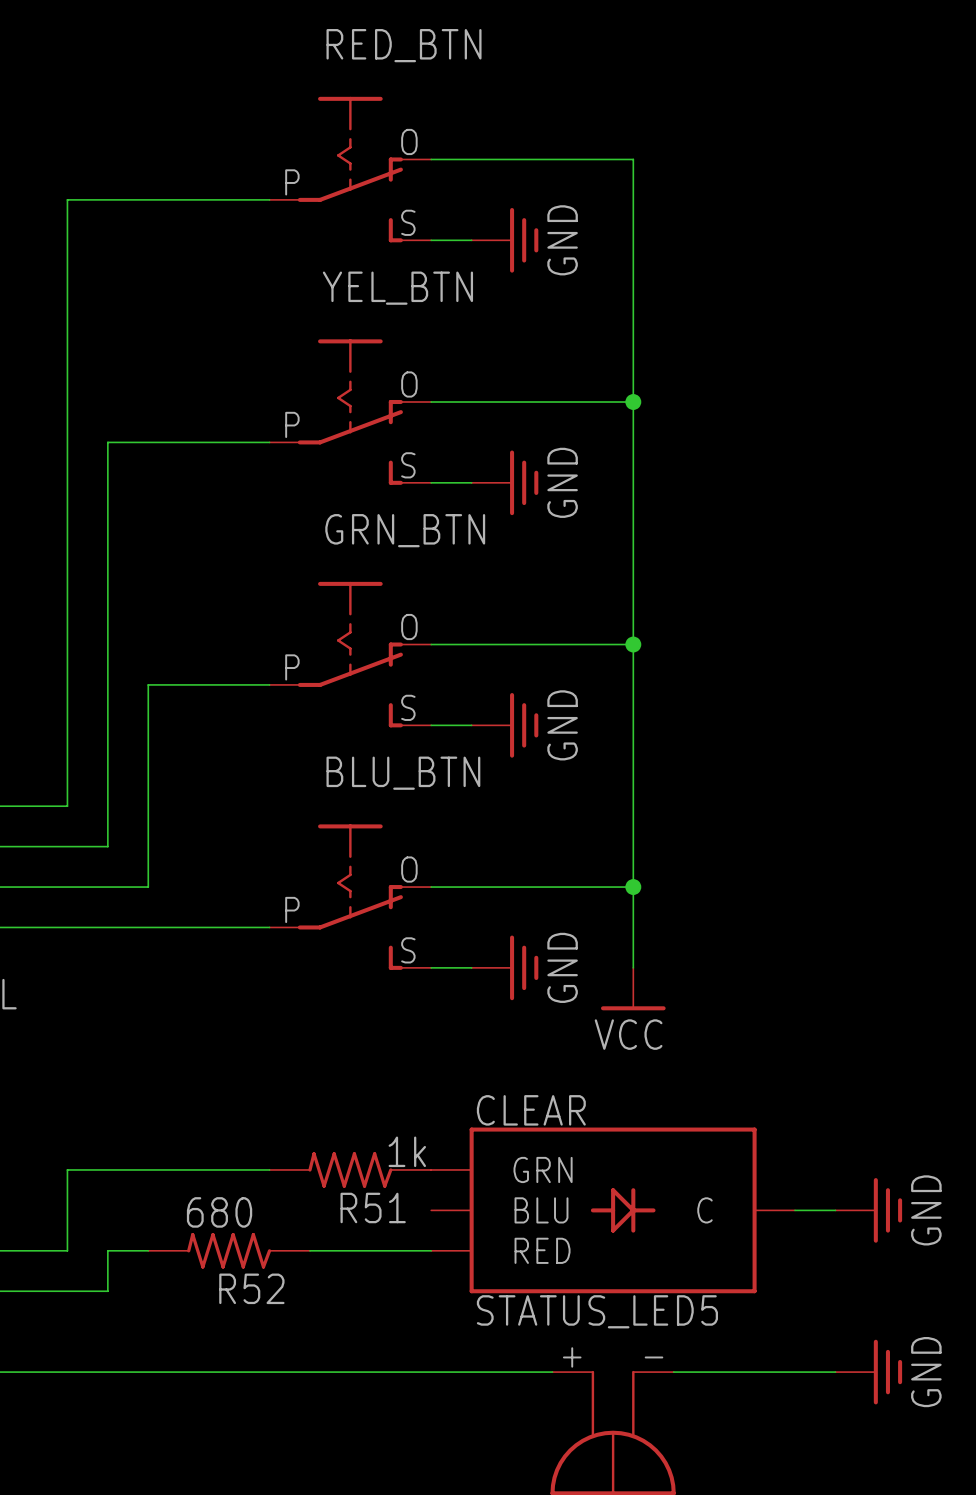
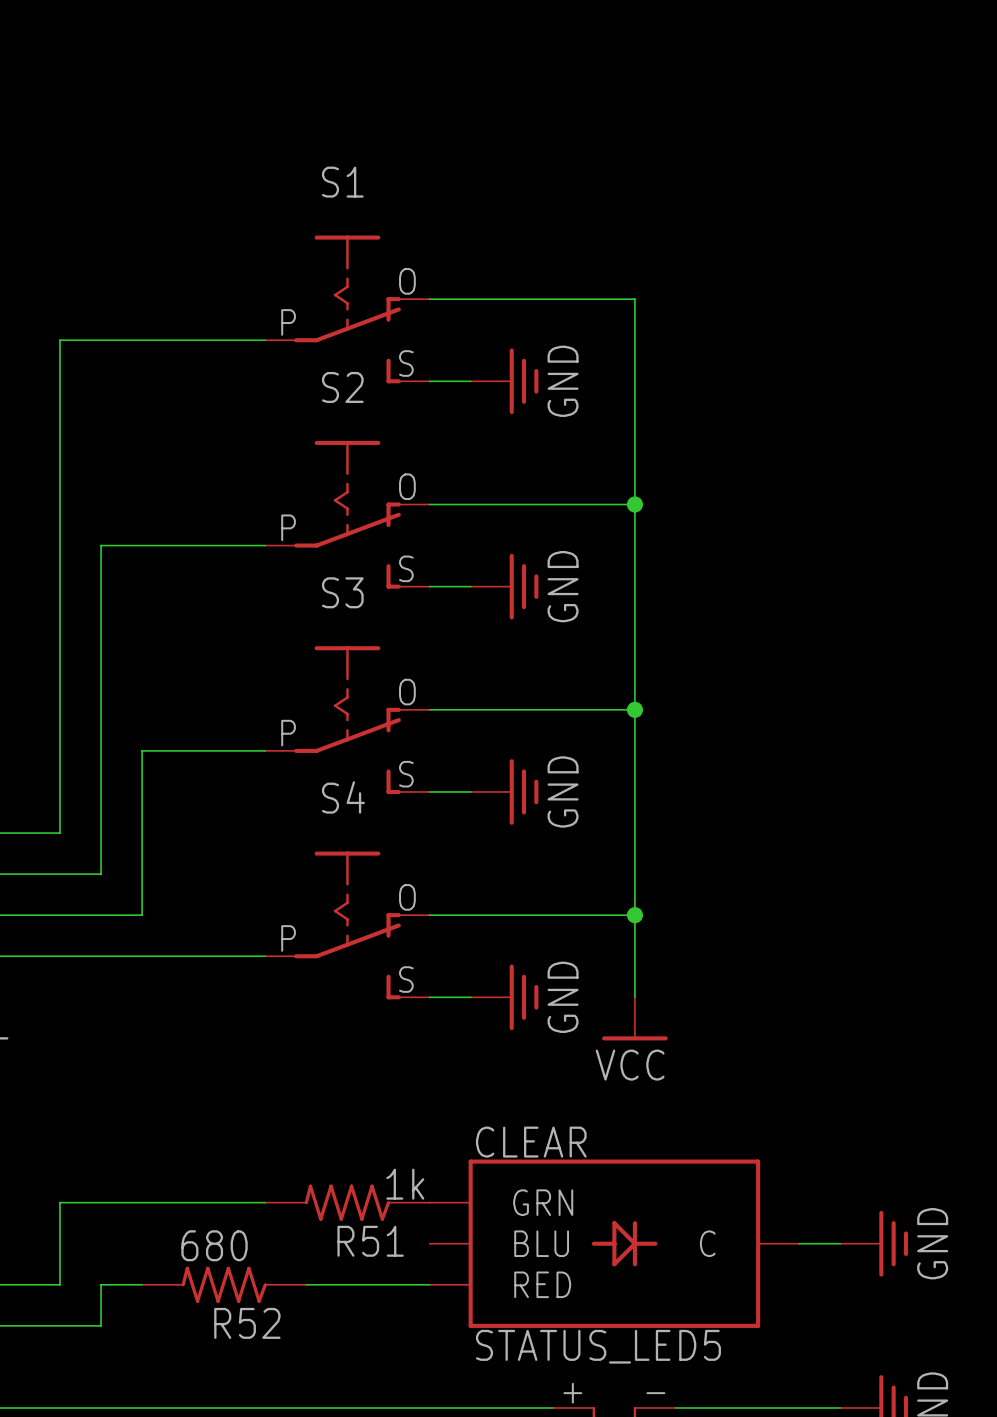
wire: (431, 159) (633, 159) (633, 280) -> (429, 299) (634, 299)
RED_BTN: (350, 169) -> none
wire: (269, 199) (67, 199) (67, 321) -> (265, 340) (59, 340)
wire: (431, 240) (471, 240) -> (429, 381) (470, 381)
power symbol: GND (504, 240) -> none
S1: none -> (347, 309)
power symbol: none -> GND (504, 381)
wire: (431, 402) (633, 402) -> none
junction: (633, 402) -> none
YEL_BTN: (350, 412) -> none
wire: (269, 442) (107, 442) (107, 523) -> (265, 545) (101, 545)
wire: none -> (470, 504) (634, 504)
power symbol: GND (504, 482) -> none
junction: none -> (634, 504)
S2: none -> (347, 514)
wire: none -> (429, 586) (470, 586)
power symbol: none -> GND (504, 586)
wire: (431, 644) (633, 644) -> (429, 709) (634, 709)
junction position: (633, 644) -> (634, 709)
GRN_BTN: (350, 654) -> none
wire: (269, 684) (148, 684) (148, 725) -> (265, 750) (142, 750)
S3: none -> (347, 720)
wire: (431, 725) (471, 725) -> (429, 791) (470, 791)
power symbol position: GND (504, 725) -> GND (504, 791)
BLU_BTN name: BLU_BTN (403, 773) -> S4 (343, 797)

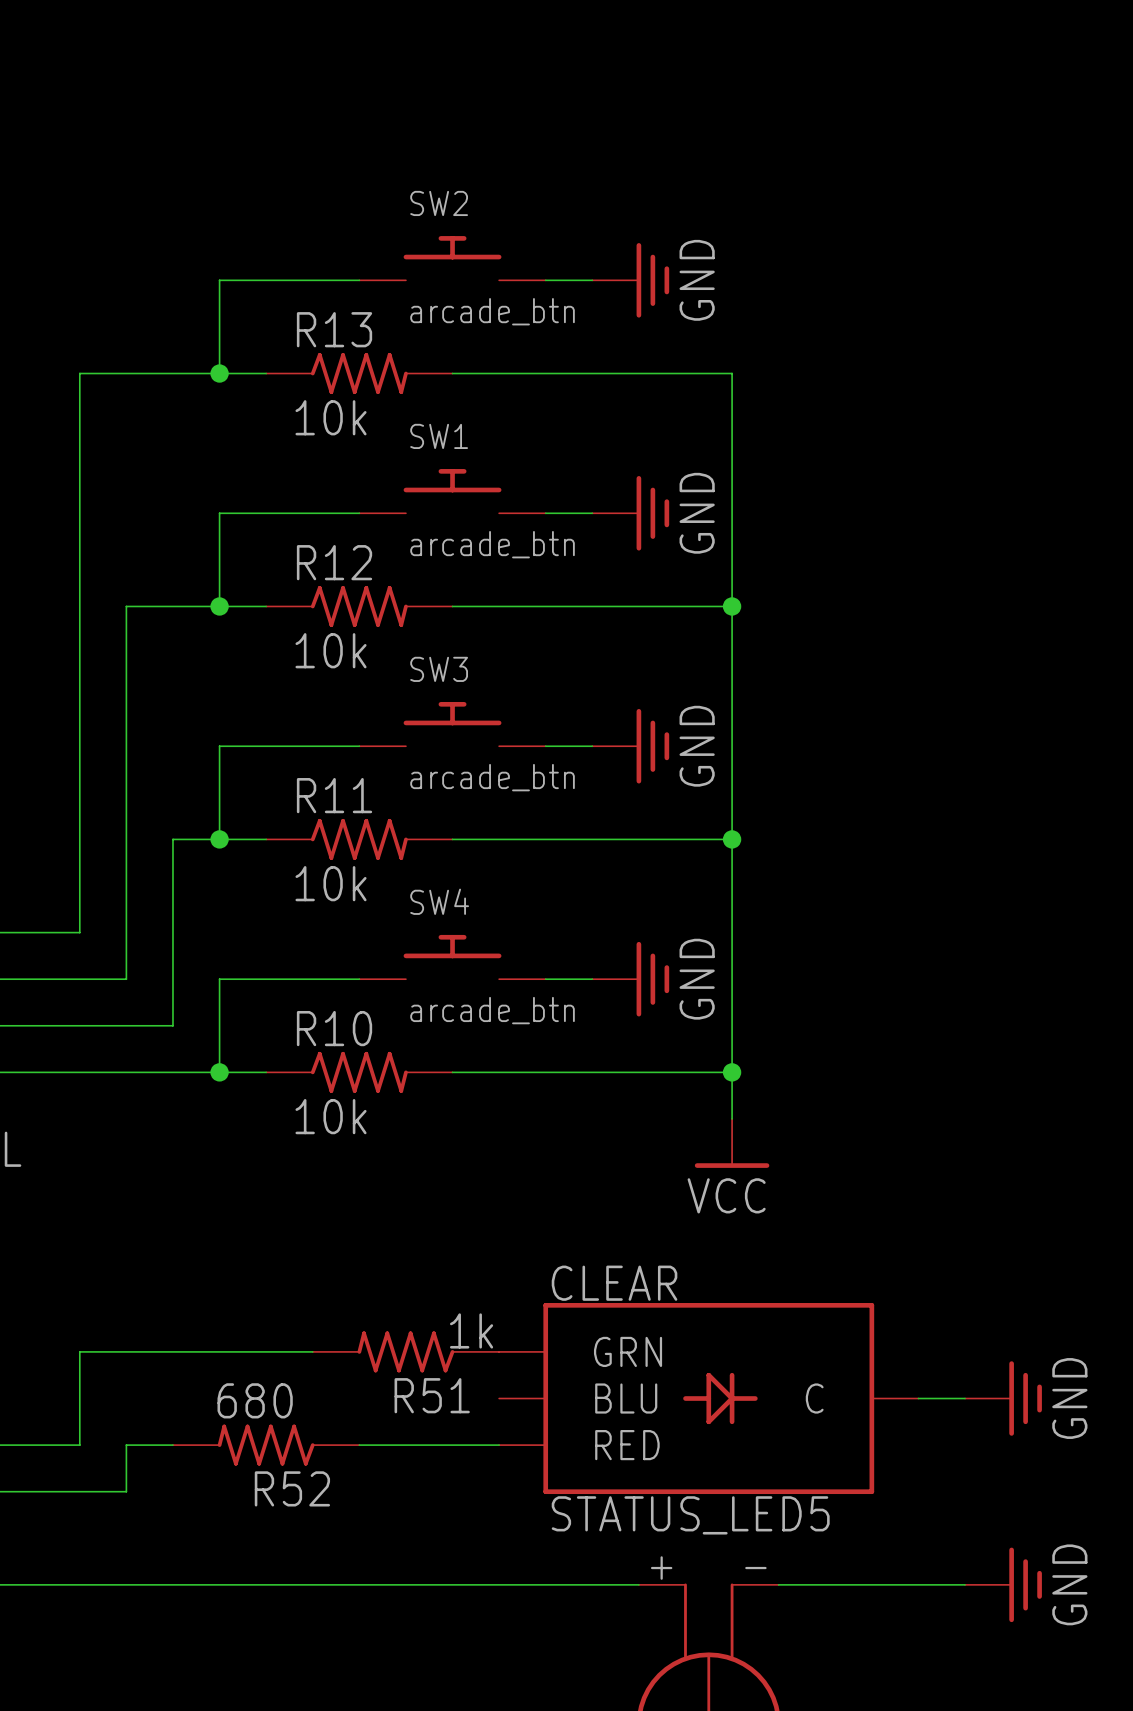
SW2: none -> arcade_btn (452, 258)
wire: none -> (359, 280) (219, 280) (219, 373)
power symbol: none -> GND (630, 280)
wire: (429, 299) (634, 299) (634, 340) -> (452, 373) (732, 373)
S1: (347, 309) -> none
junction: none -> (219, 373)
R13: none -> 10k (359, 373)
wire: (429, 381) (470, 381) -> (545, 280) (592, 280)
power symbol: GND (504, 381) -> none
SW1: none -> arcade_btn (452, 491)
wire: none -> (359, 513) (219, 513) (219, 606)
power symbol: none -> GND (630, 513)
wire: (429, 504) (634, 504) -> none
junction position: (634, 504) -> (732, 606)
S2: (347, 514) -> none
junction: none -> (219, 606)
R12: none -> 10k (359, 606)
wire: none -> (452, 606) (732, 606)
wire: (429, 586) (470, 586) -> (545, 513) (592, 513)
power symbol: GND (504, 586) -> none
SW3: none -> arcade_btn (452, 724)
wire: none -> (359, 746) (219, 746) (219, 839)
power symbol: none -> GND (630, 746)
wire: (429, 709) (634, 709) -> none
junction position: (634, 709) -> (732, 839)
S3: (347, 720) -> none
junction: none -> (219, 839)
R11: none -> 10k (359, 839)
wire: none -> (452, 839) (732, 839)
wire: (429, 791) (470, 791) -> (545, 746) (592, 746)
power symbol: GND (504, 791) -> none
SW4: none -> arcade_btn (452, 957)
wire: none -> (359, 979) (219, 979) (219, 1072)
power symbol: none -> GND (630, 979)
wire: (429, 915) (634, 915) -> none
junction position: (634, 915) -> (732, 1072)
S4: (347, 925) -> none
junction: none -> (219, 1072)
R10: none -> 10k (359, 1072)
wire: none -> (452, 1072) (732, 1072)
wire: (429, 997) (470, 997) -> (545, 979) (592, 979)
power symbol: GND (504, 997) -> none

